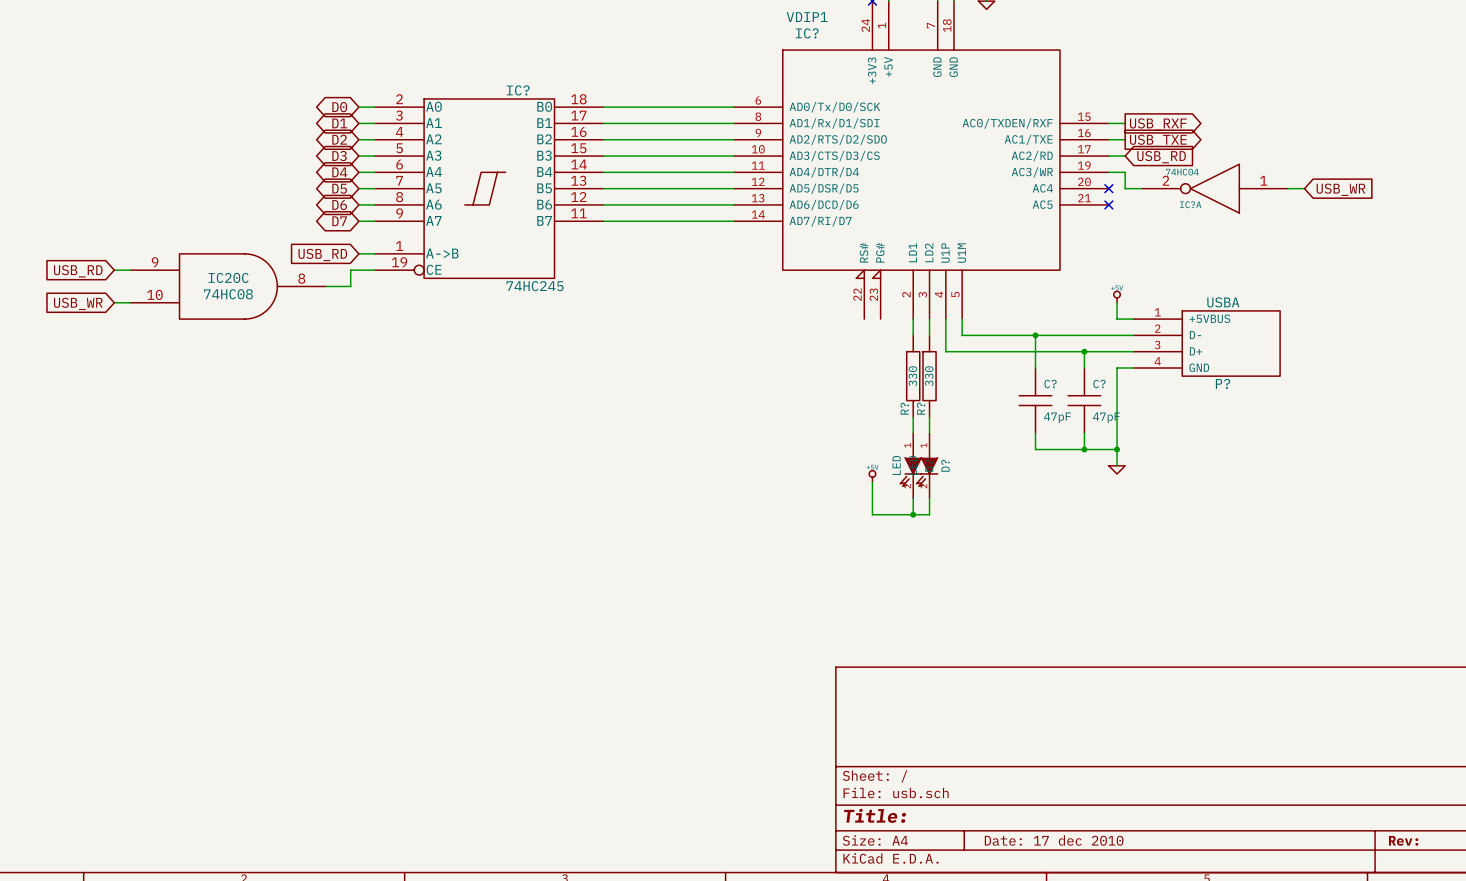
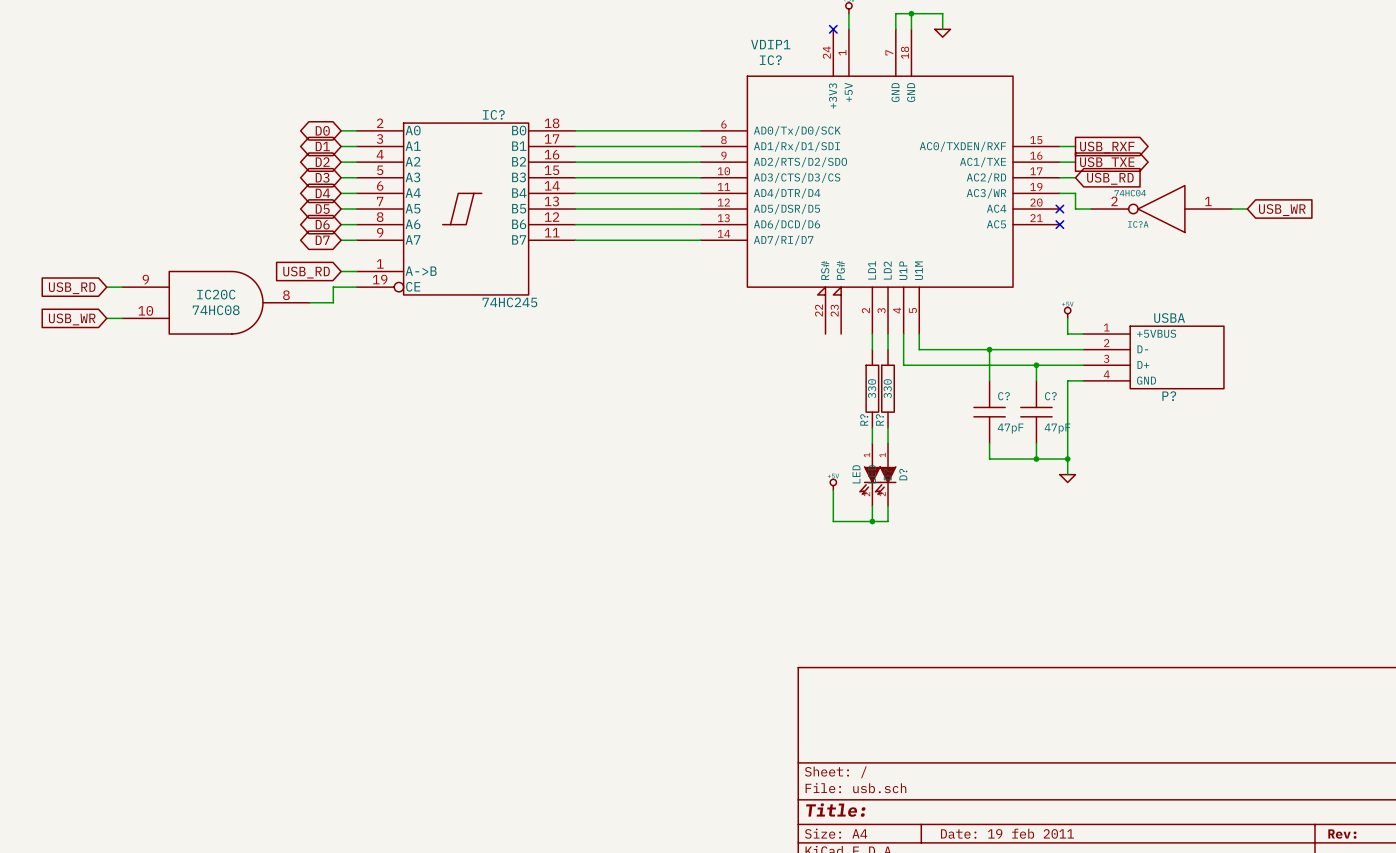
title block: Date: 17 dec 2010 (1054, 840) -> Date: 19 feb 2011 (1007, 833)

